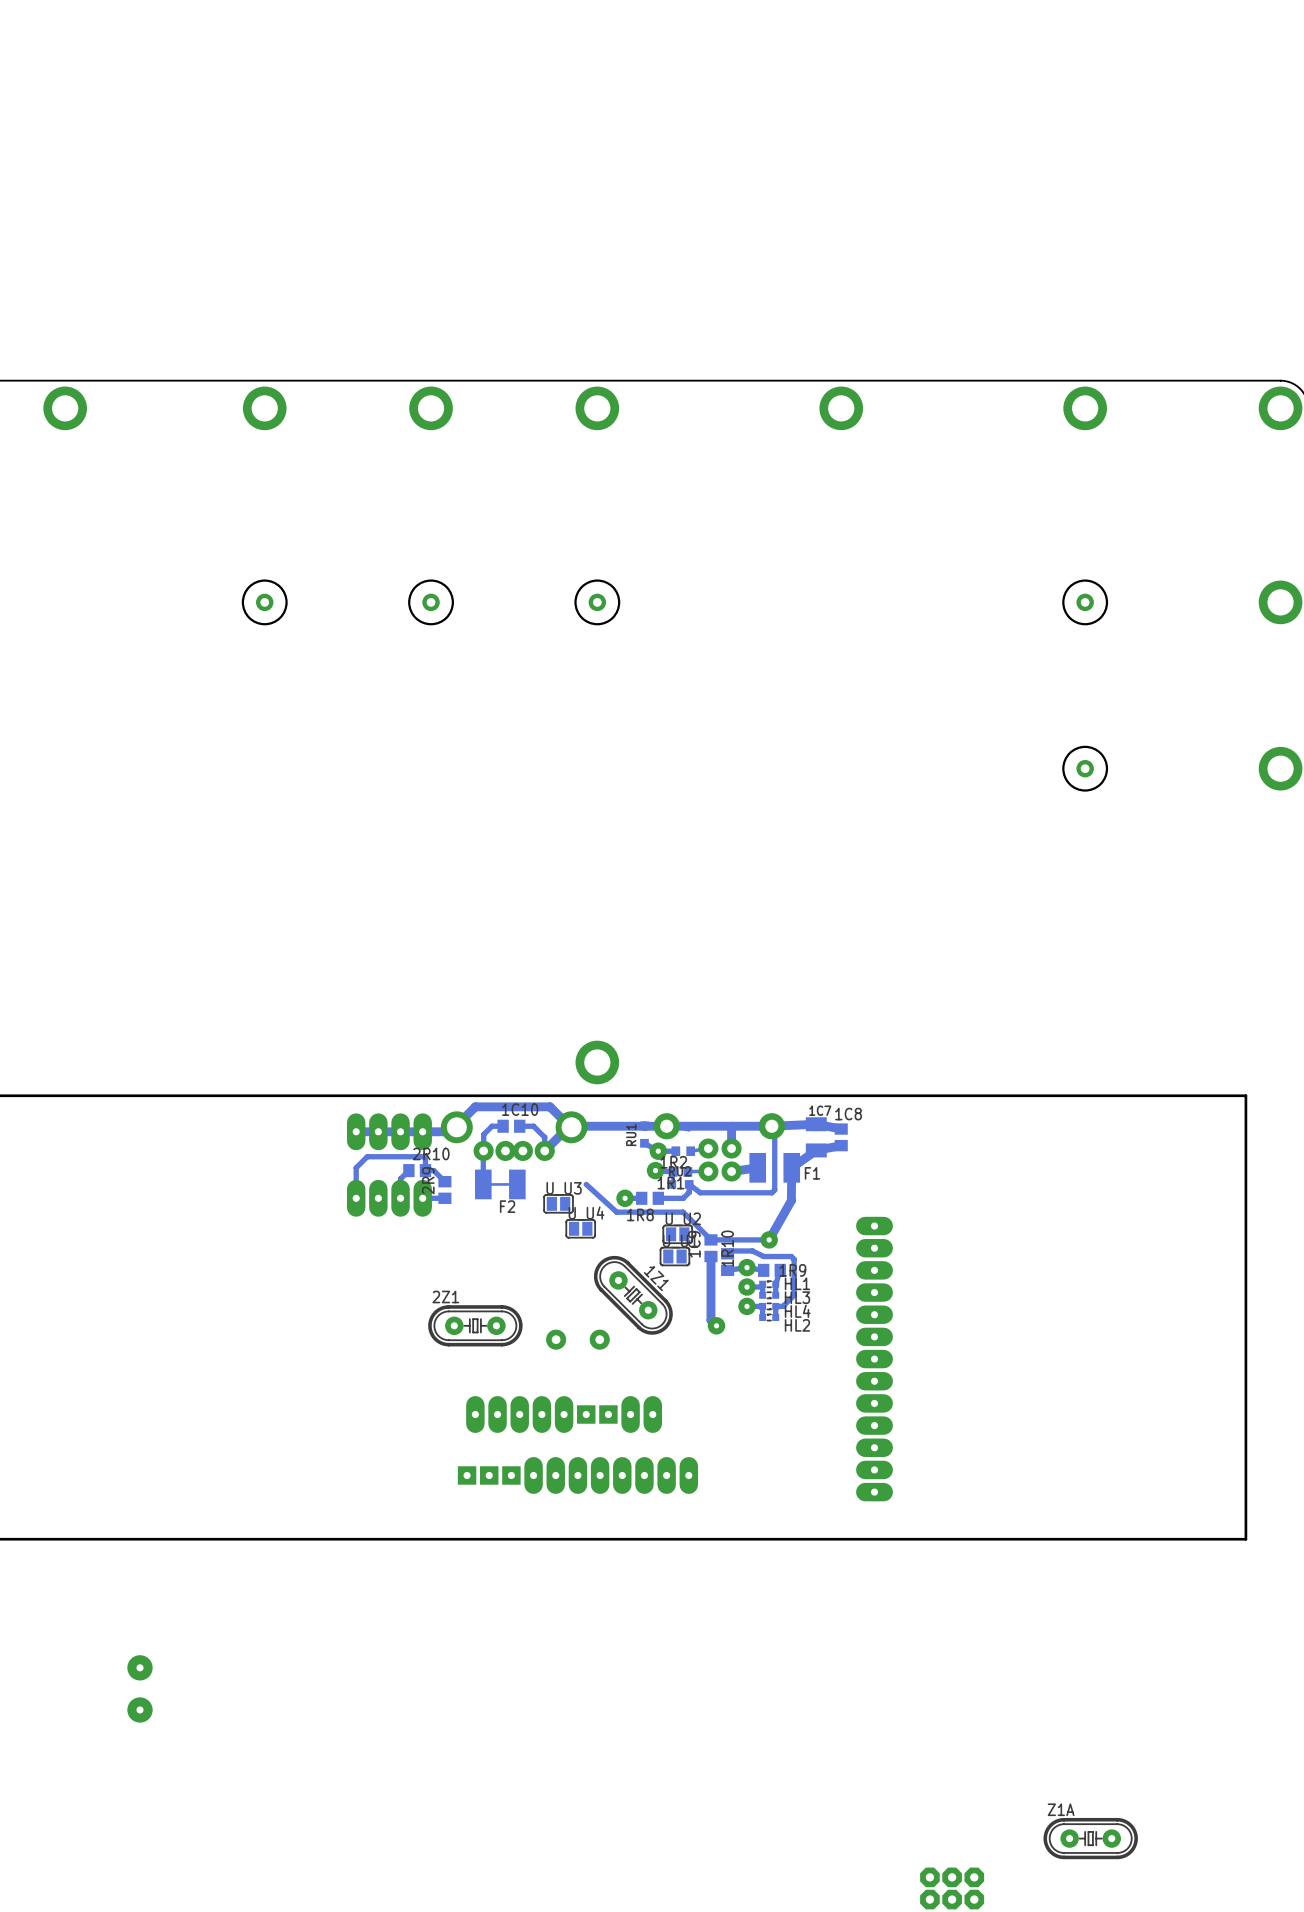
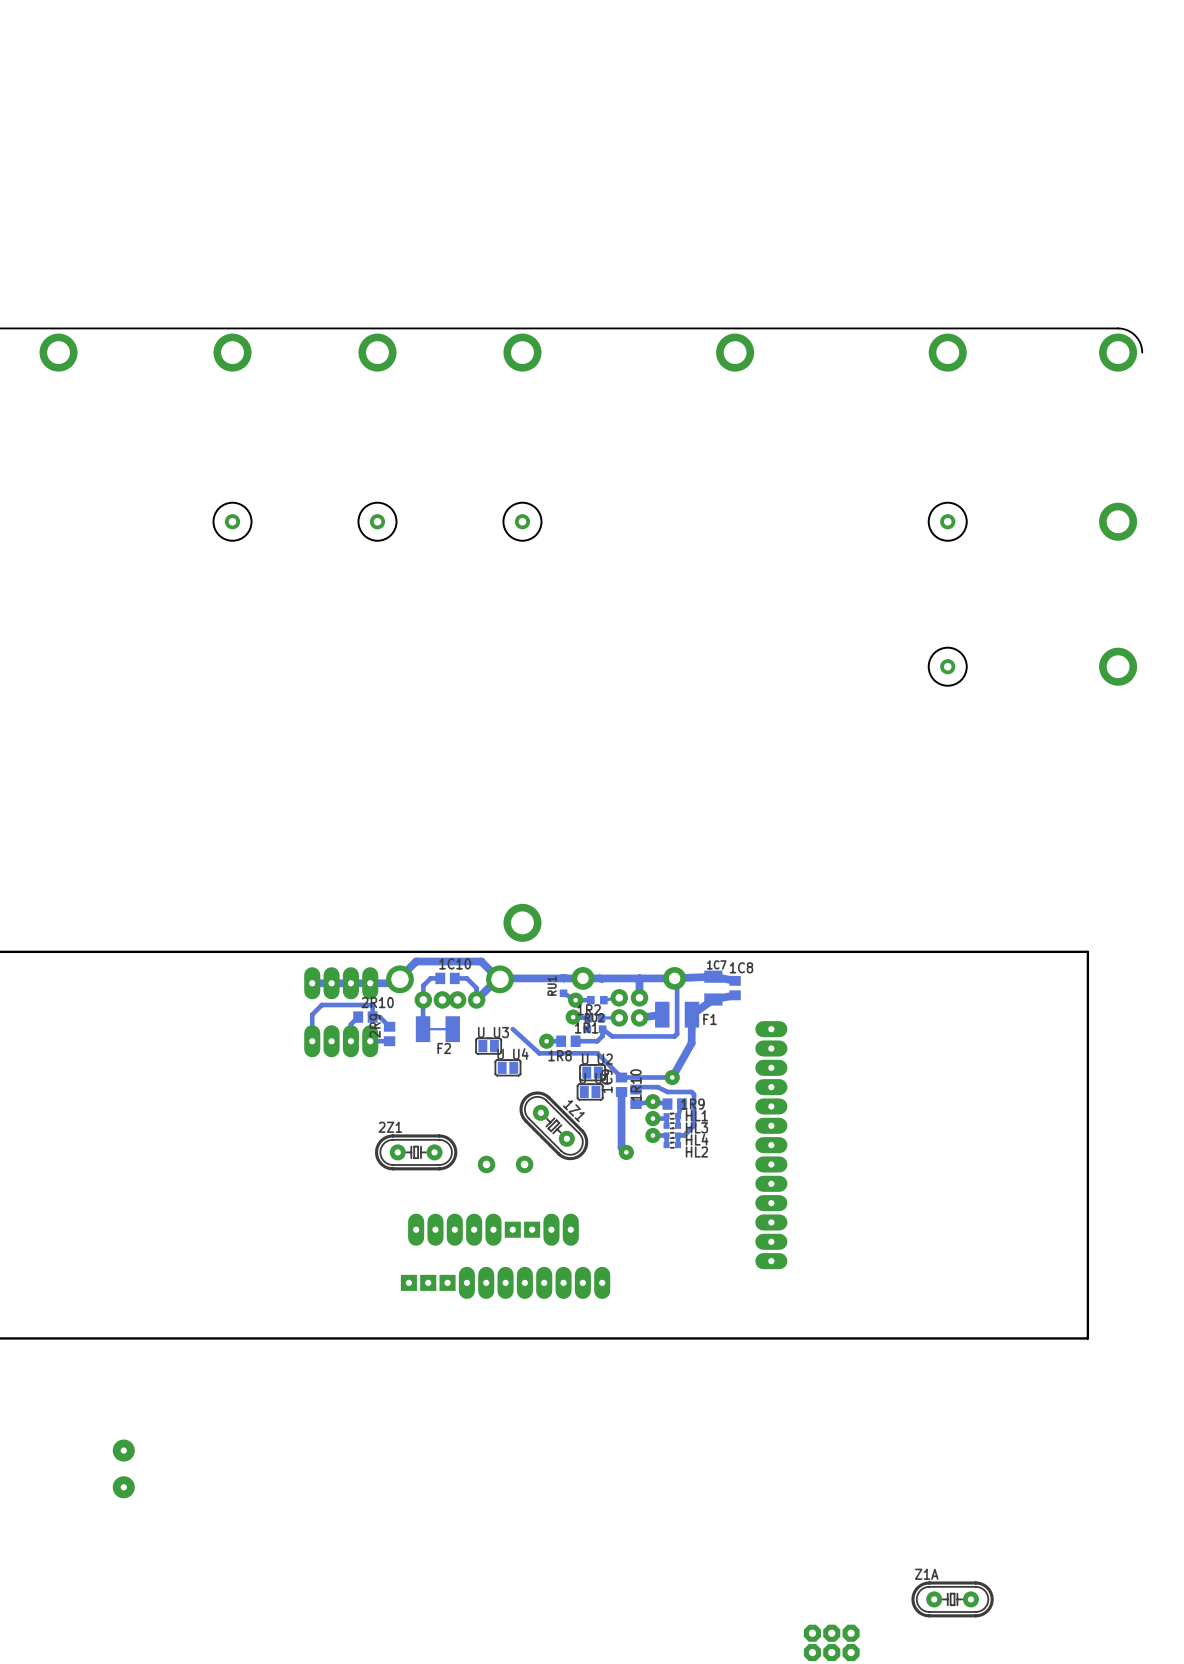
part position: (874, 1359) -> (771, 1145)

